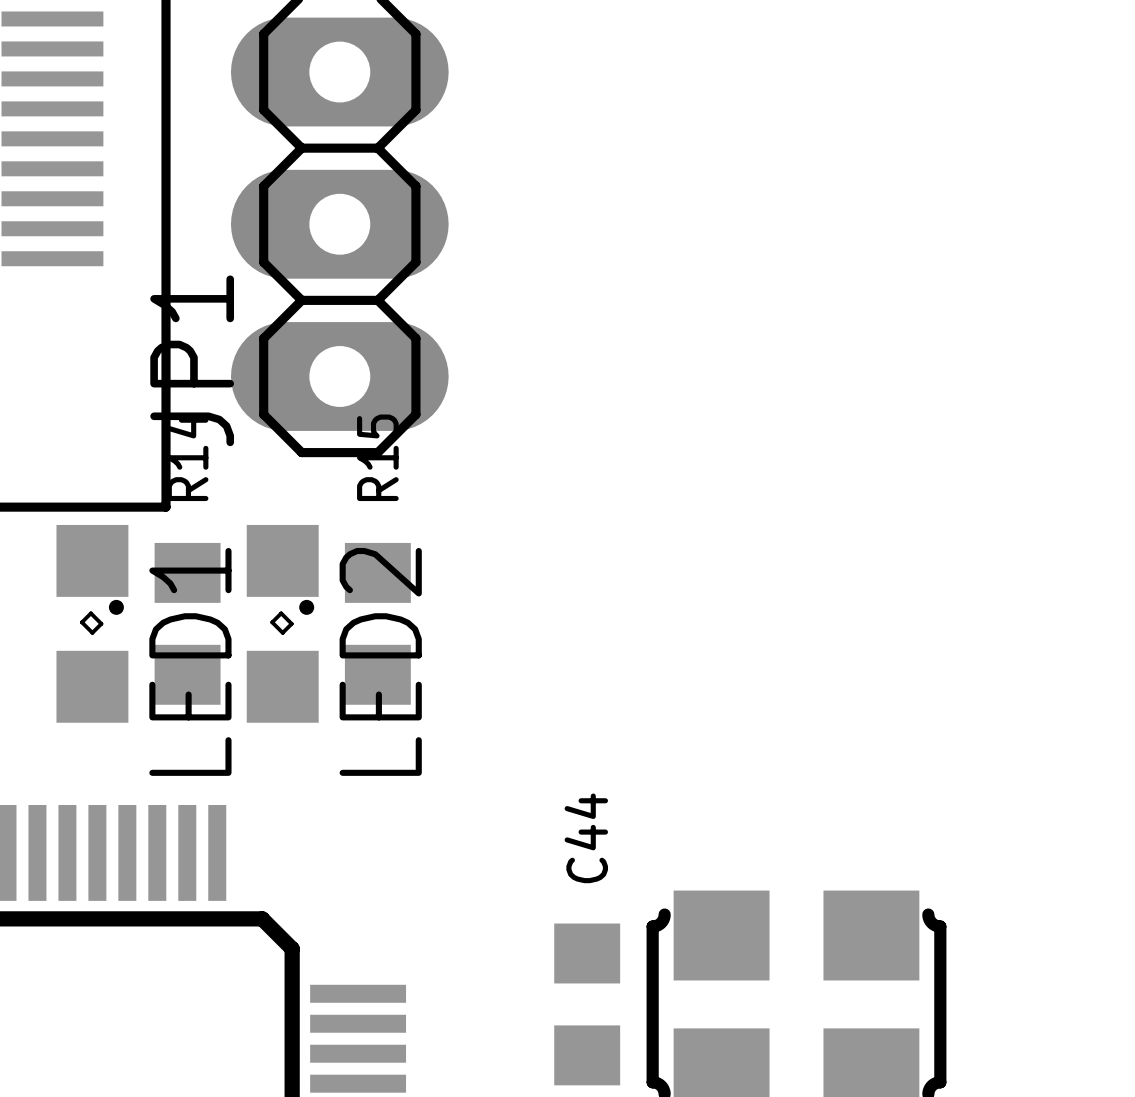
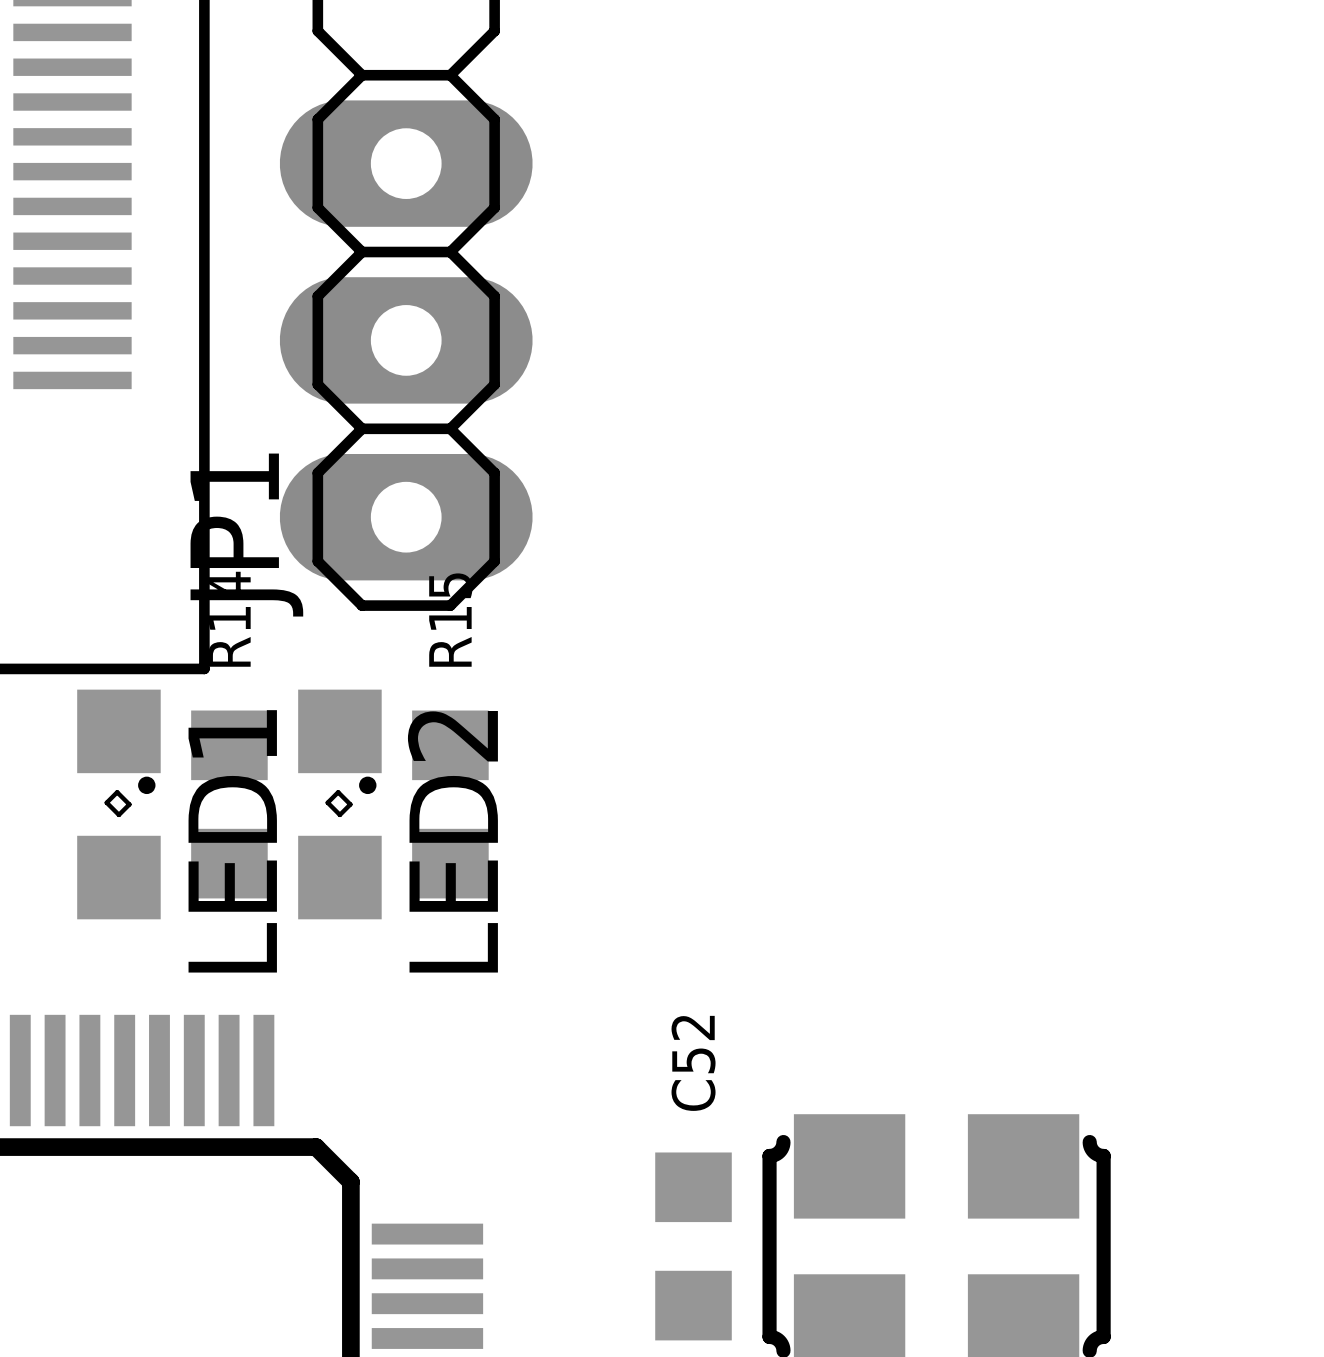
C44 name: C44 (586, 838) -> C52 (693, 1063)

